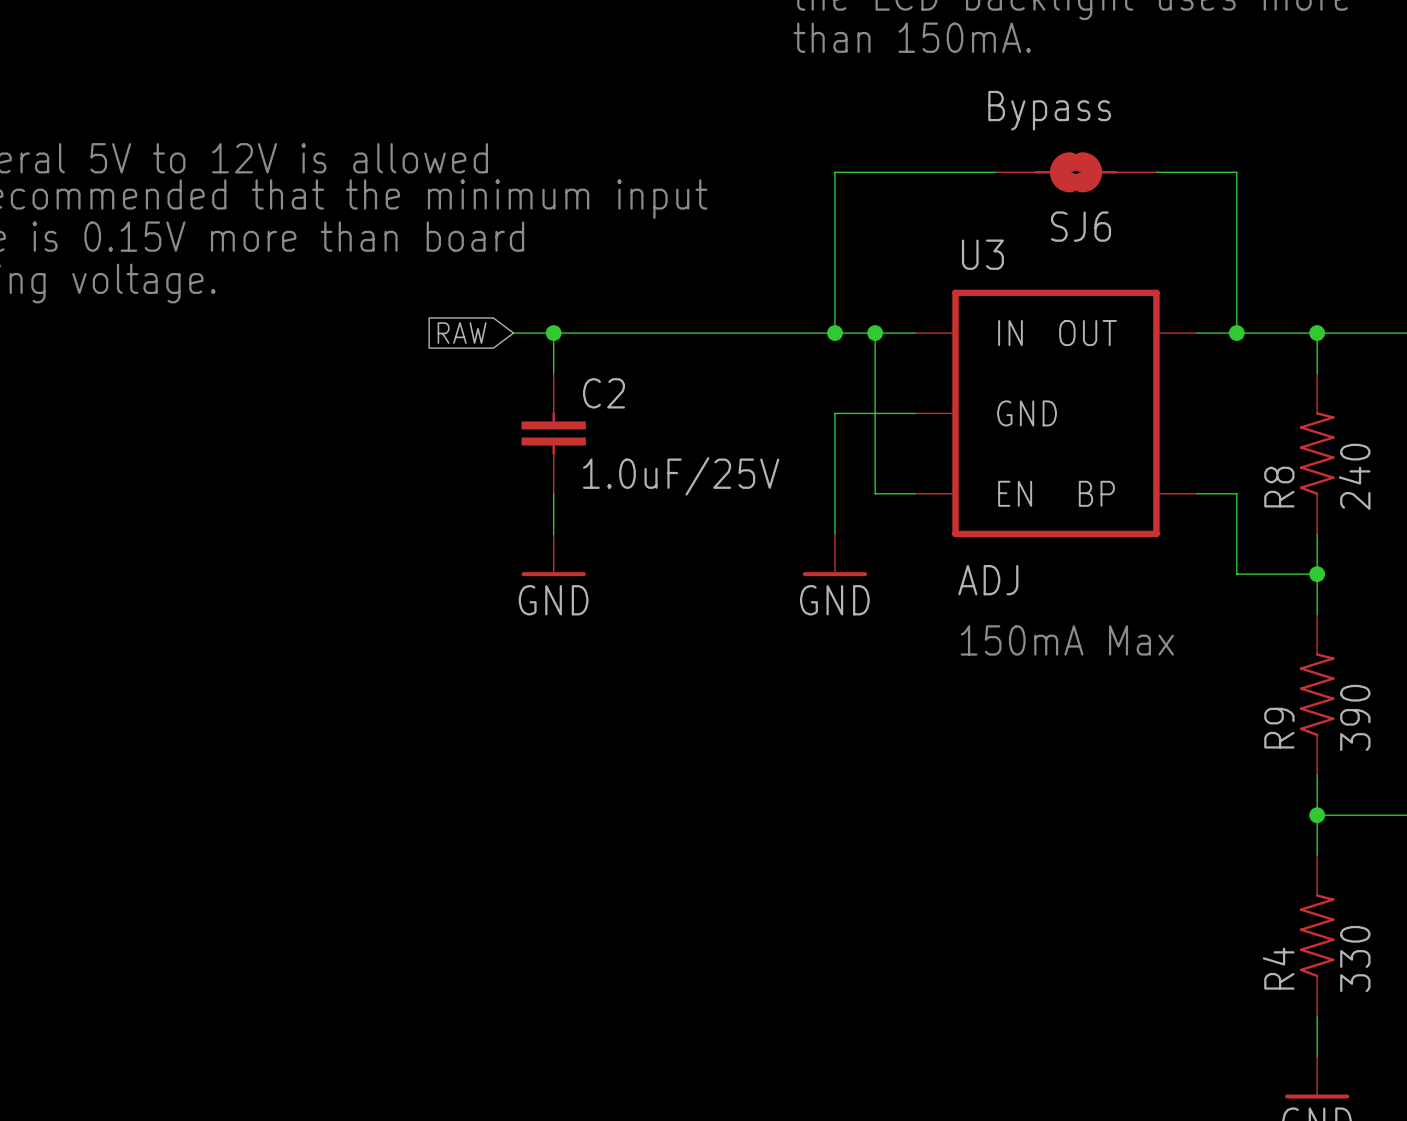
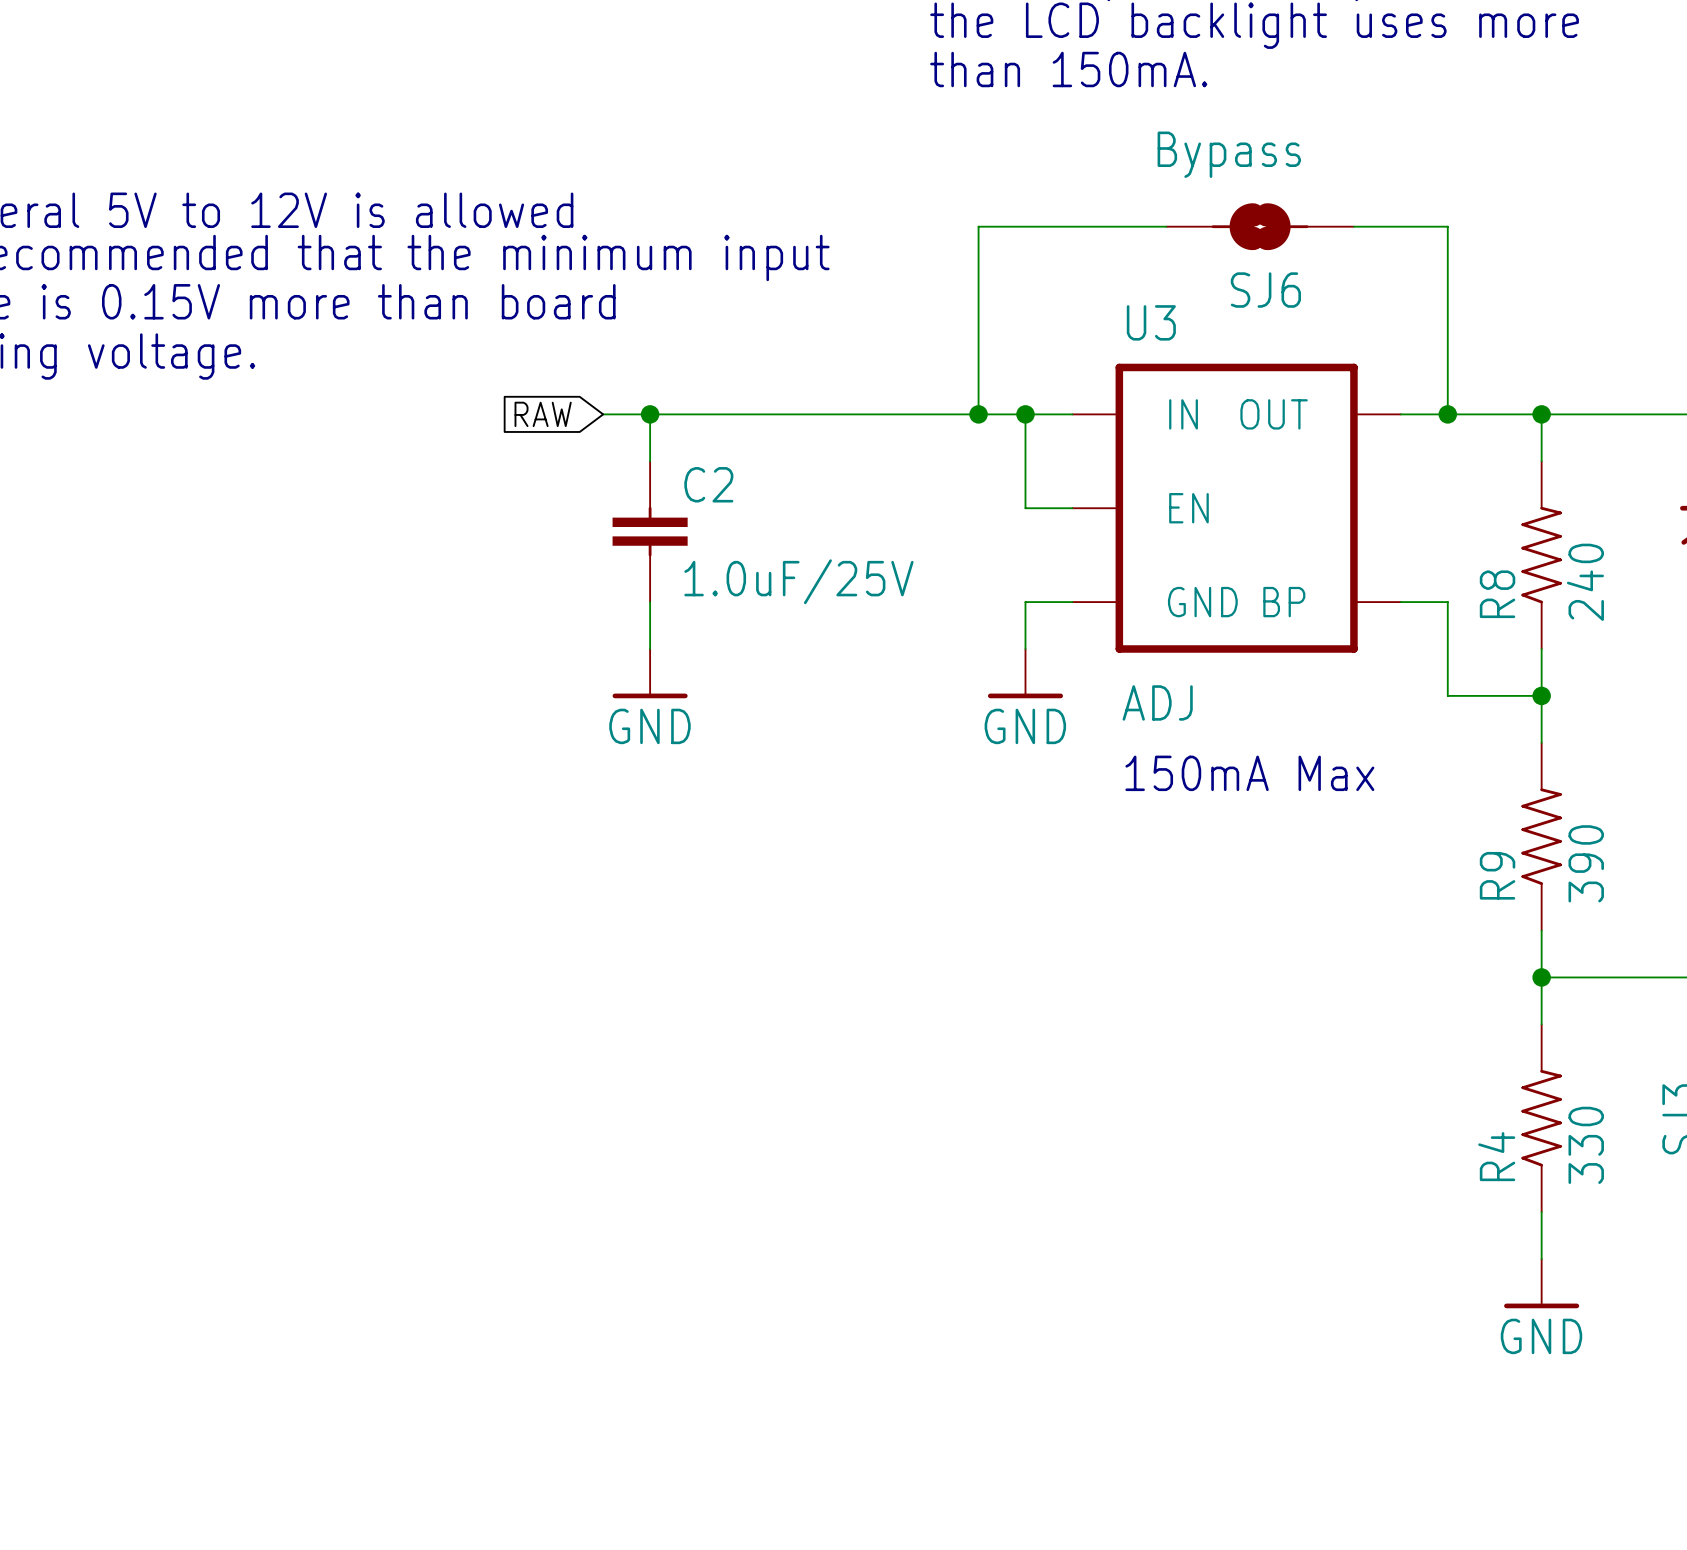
U3 pin name: GND (1027, 413) -> EN (1188, 508)
wire: (875, 493) (875, 413) (834, 413) (834, 533) -> (1025, 602) (1025, 649)
U3 pin name: EN (1015, 493) -> GND (1202, 602)
power symbol position: GND (834, 555) -> GND (1025, 673)

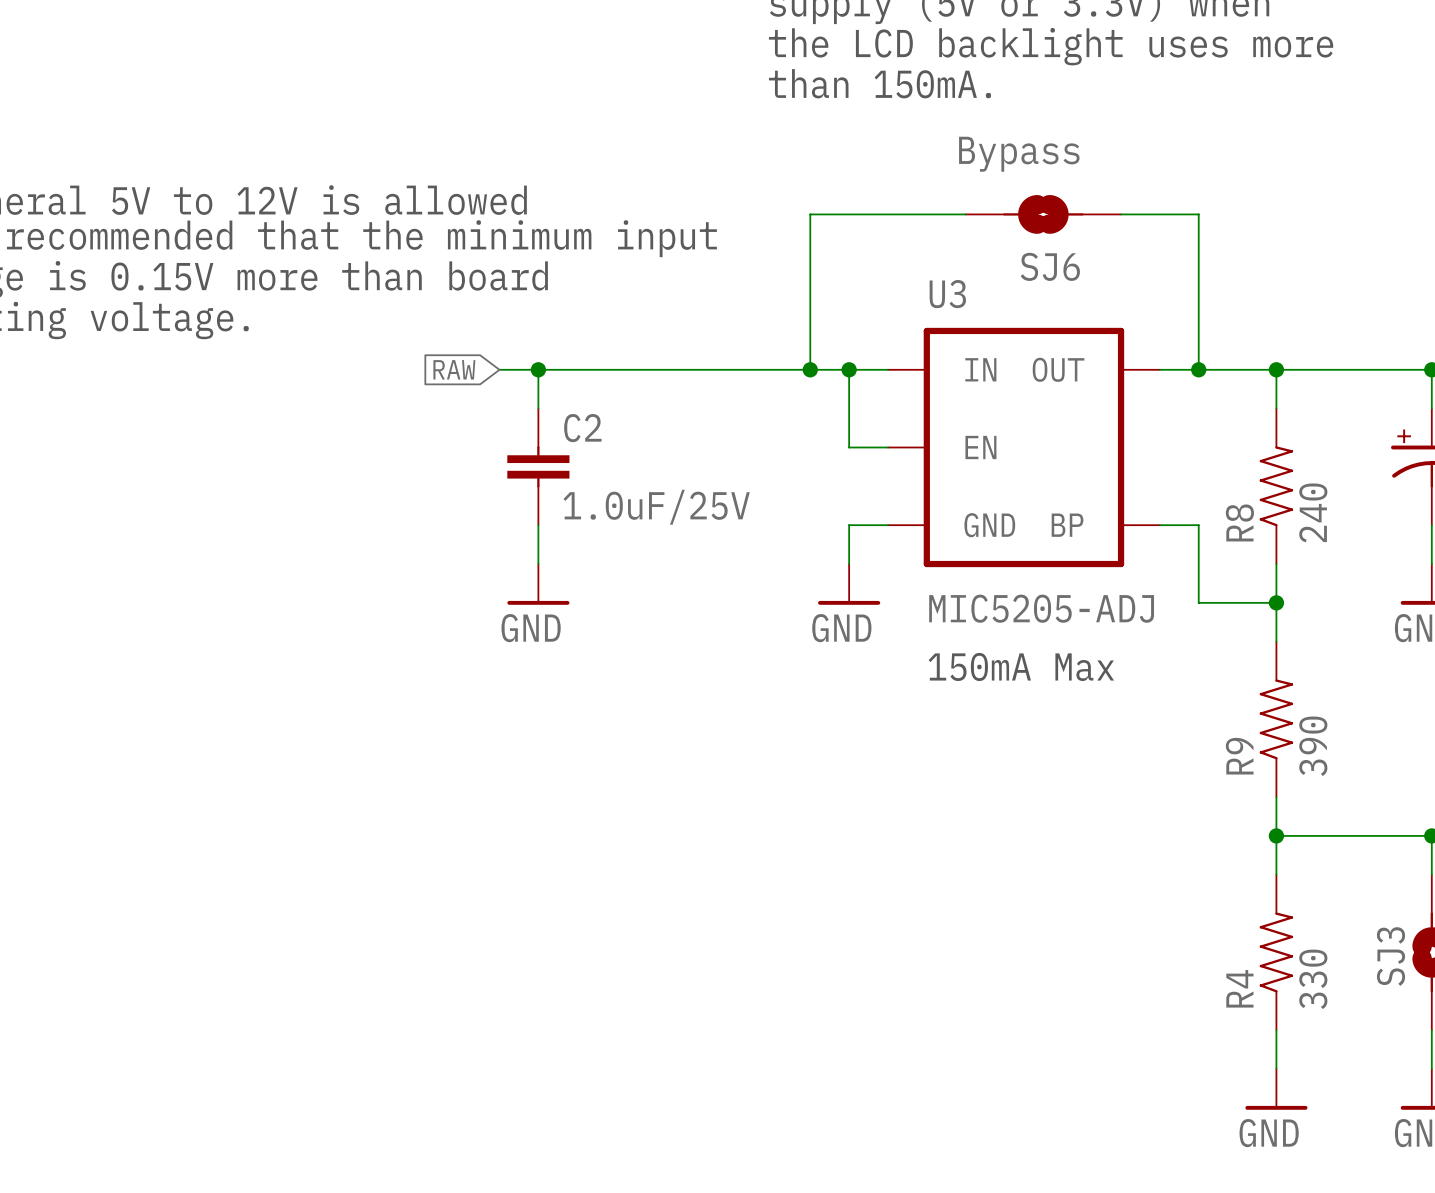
U3 value: ADJ (1157, 702) -> MIC5205-ADJ (1041, 608)

